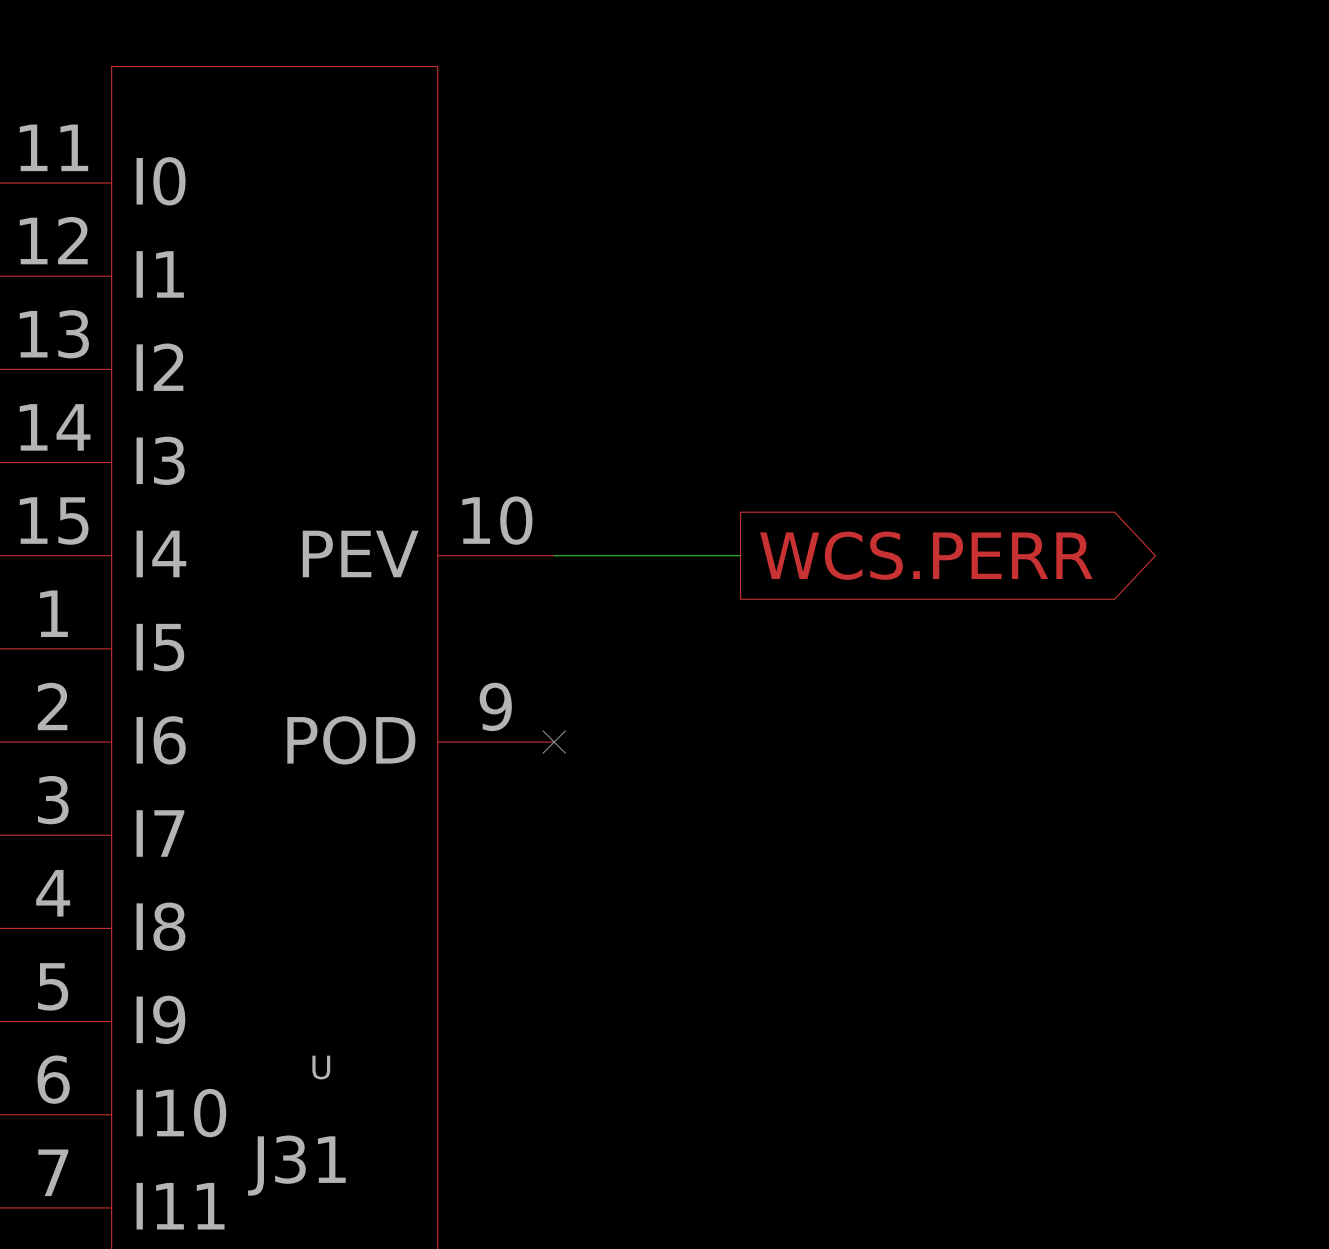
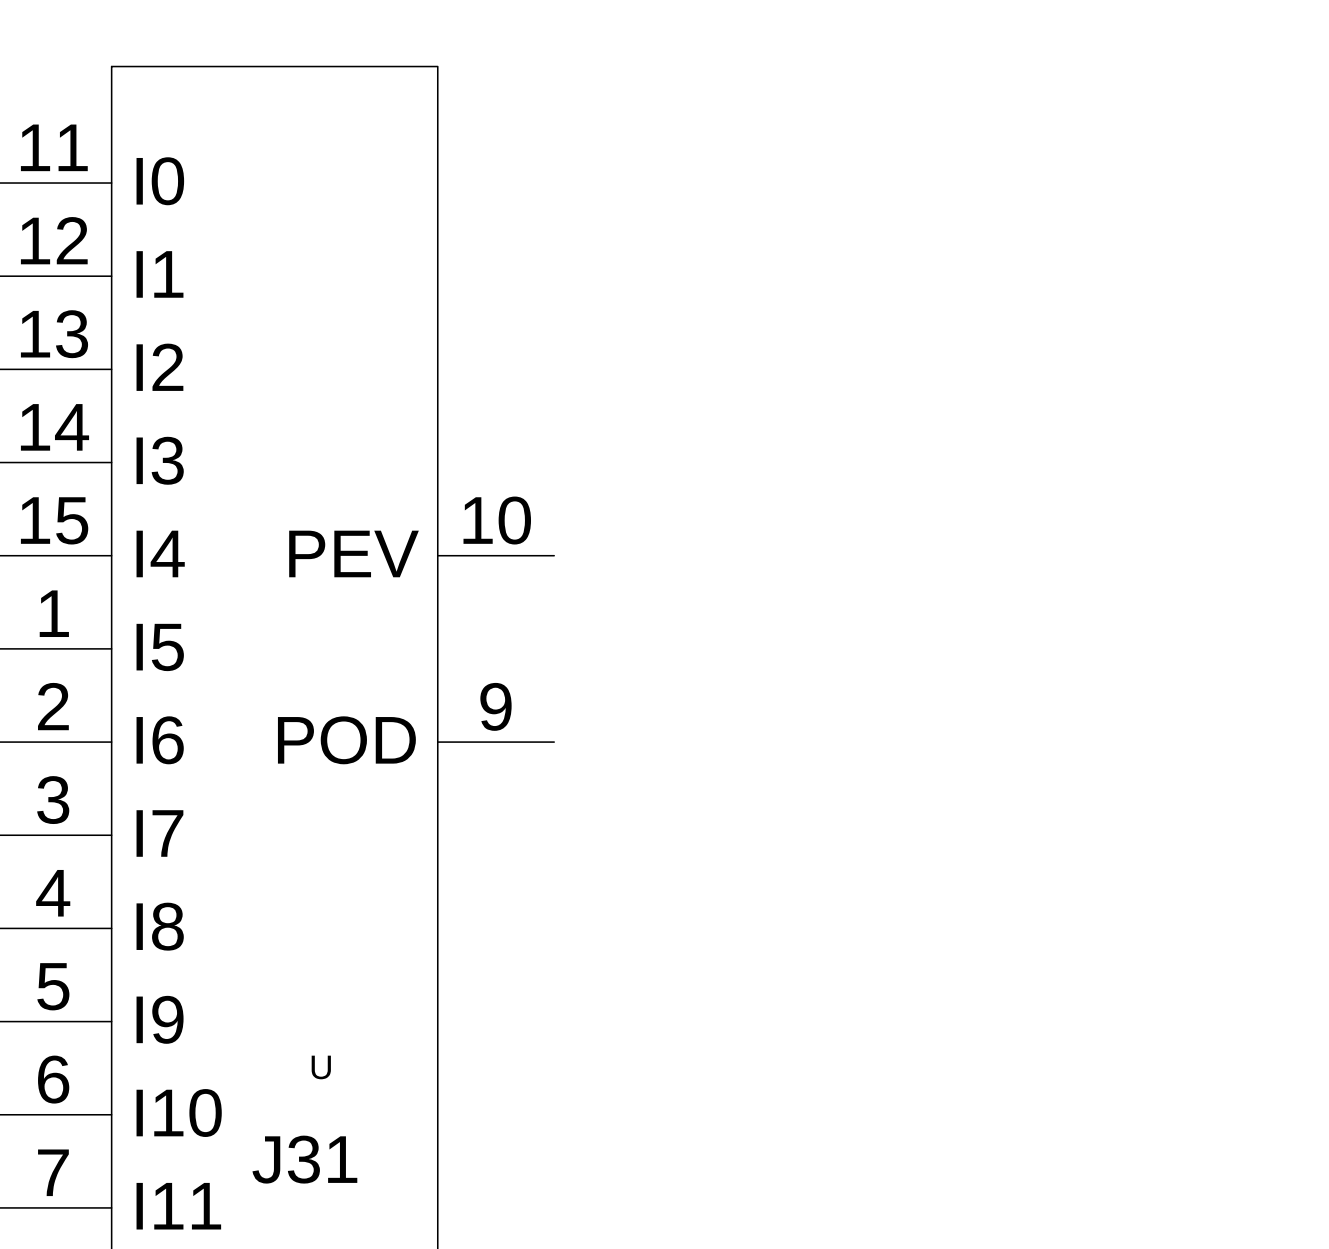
wire: (554, 555) (740, 555) -> none
global label: WCS.PERR (926, 555) -> none
no-connect mark: (554, 742) -> none

